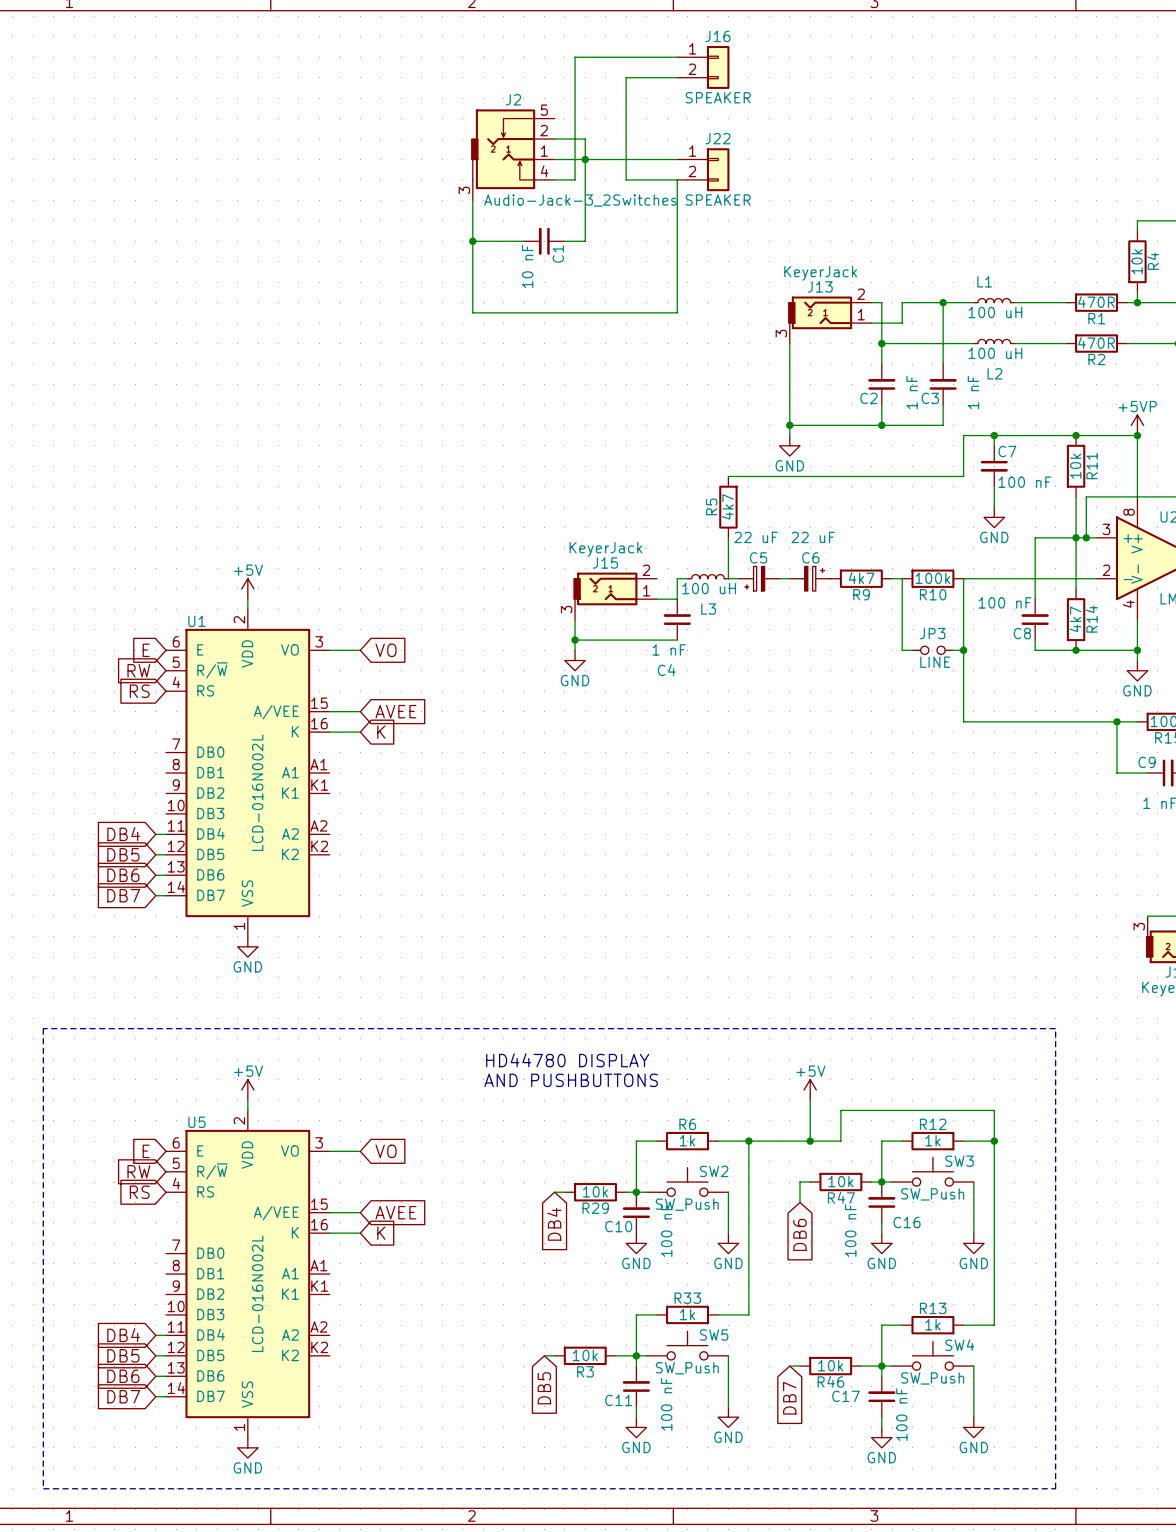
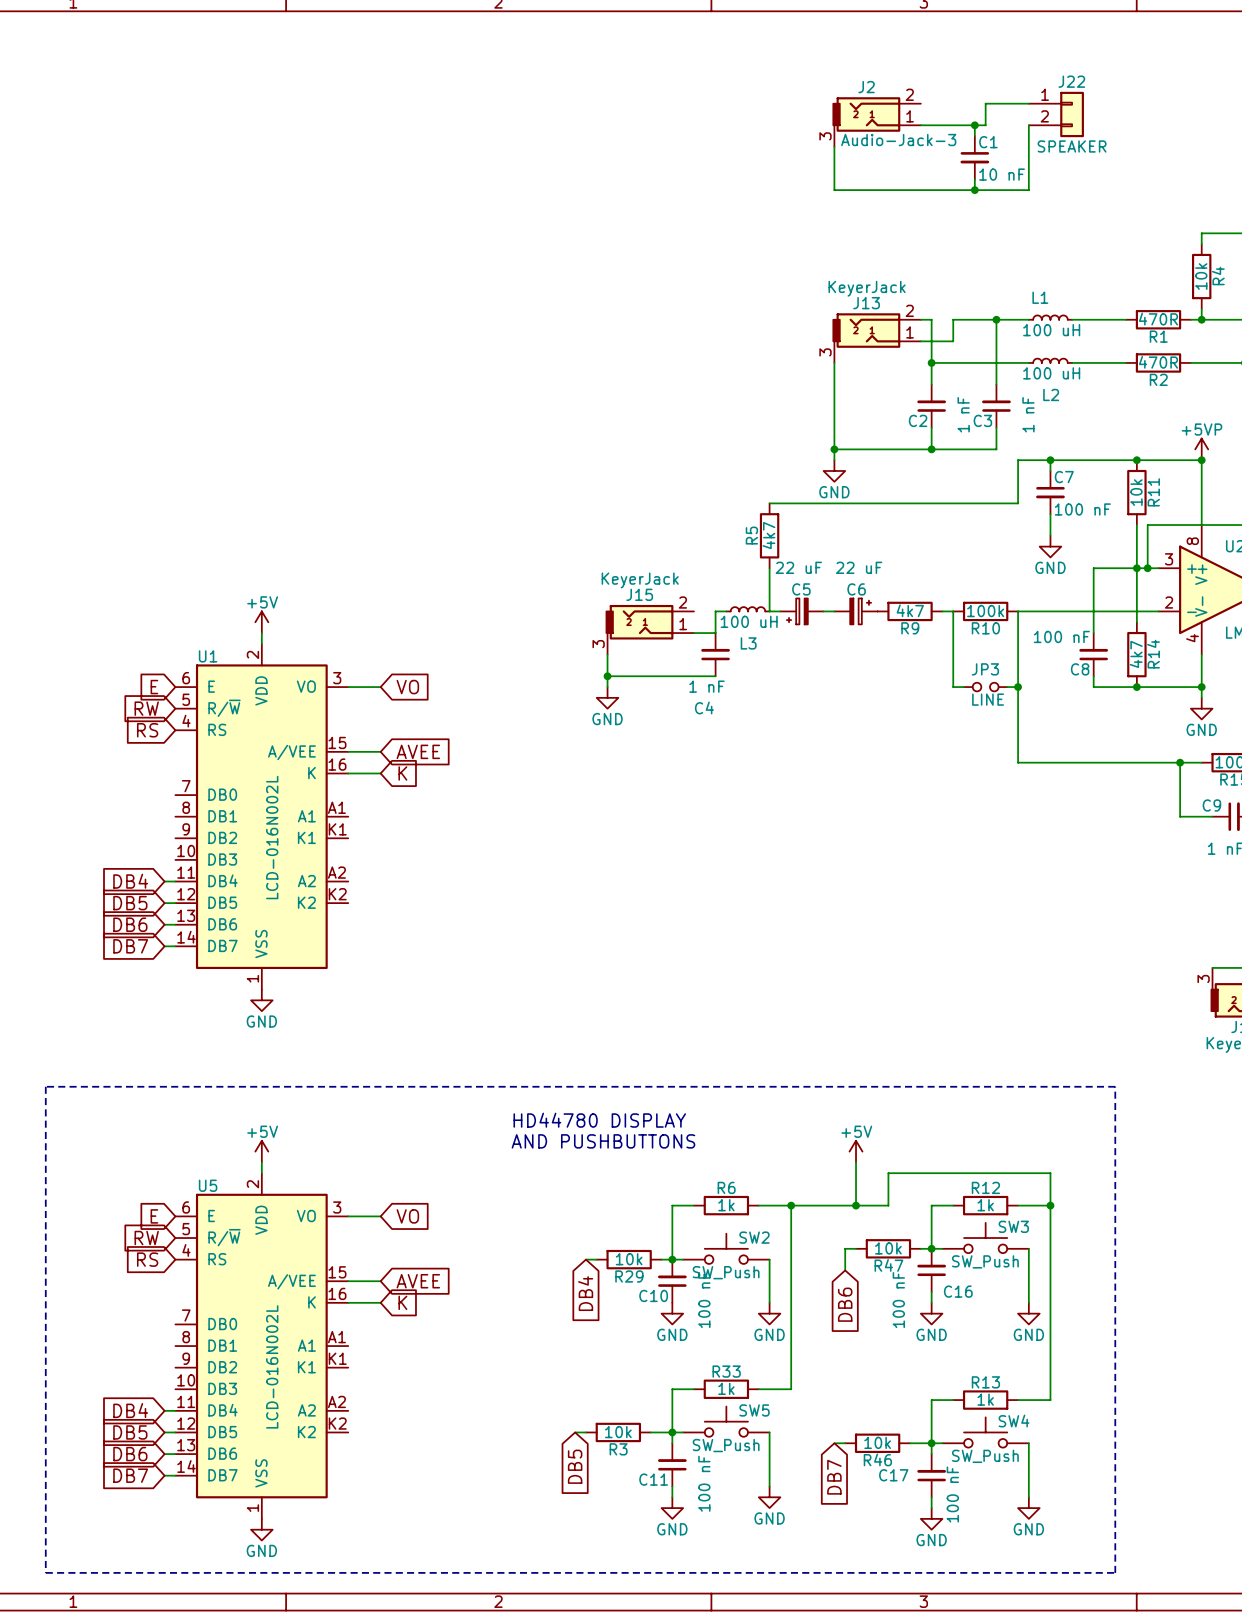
wire: (677, 57) (575, 57) (575, 179) (554, 179) -> none
J16: SPEAKER (703, 67) -> none
wire: (677, 77) (626, 77) (626, 179) (677, 179) (677, 312) (472, 312) (472, 200) -> none
wire: none -> (1028, 103) (985, 103) (985, 125) (920, 125)
J2 name position: J2 (513, 99) -> J2 (866, 87)
J2 symbol: [471, 109, 555, 201] -> [833, 97, 921, 147]
wire: none -> (974, 125) (974, 136)
junction: none -> (974, 125)
wire: none -> (1028, 125) (1028, 190) (834, 190) (834, 146)
wire: (554, 139) (585, 139) (585, 241) (564, 241) -> none
wire: (554, 159) (677, 159) -> none
junction: (585, 159) -> none
J22 position: (703, 169) -> (1056, 114)
wire: none -> (974, 179) (974, 190)
junction: none -> (974, 190)
J2 value: Audio-Jack-3_2Switches (580, 200) -> Audio-Jack-3 (898, 140)
wire: (472, 241) (523, 241) -> none
junction: (472, 241) -> none
C1 rotation: 0° (544, 241) -> 90° counterclockwise (974, 157)
C1 position: (544, 241) -> (974, 157)

